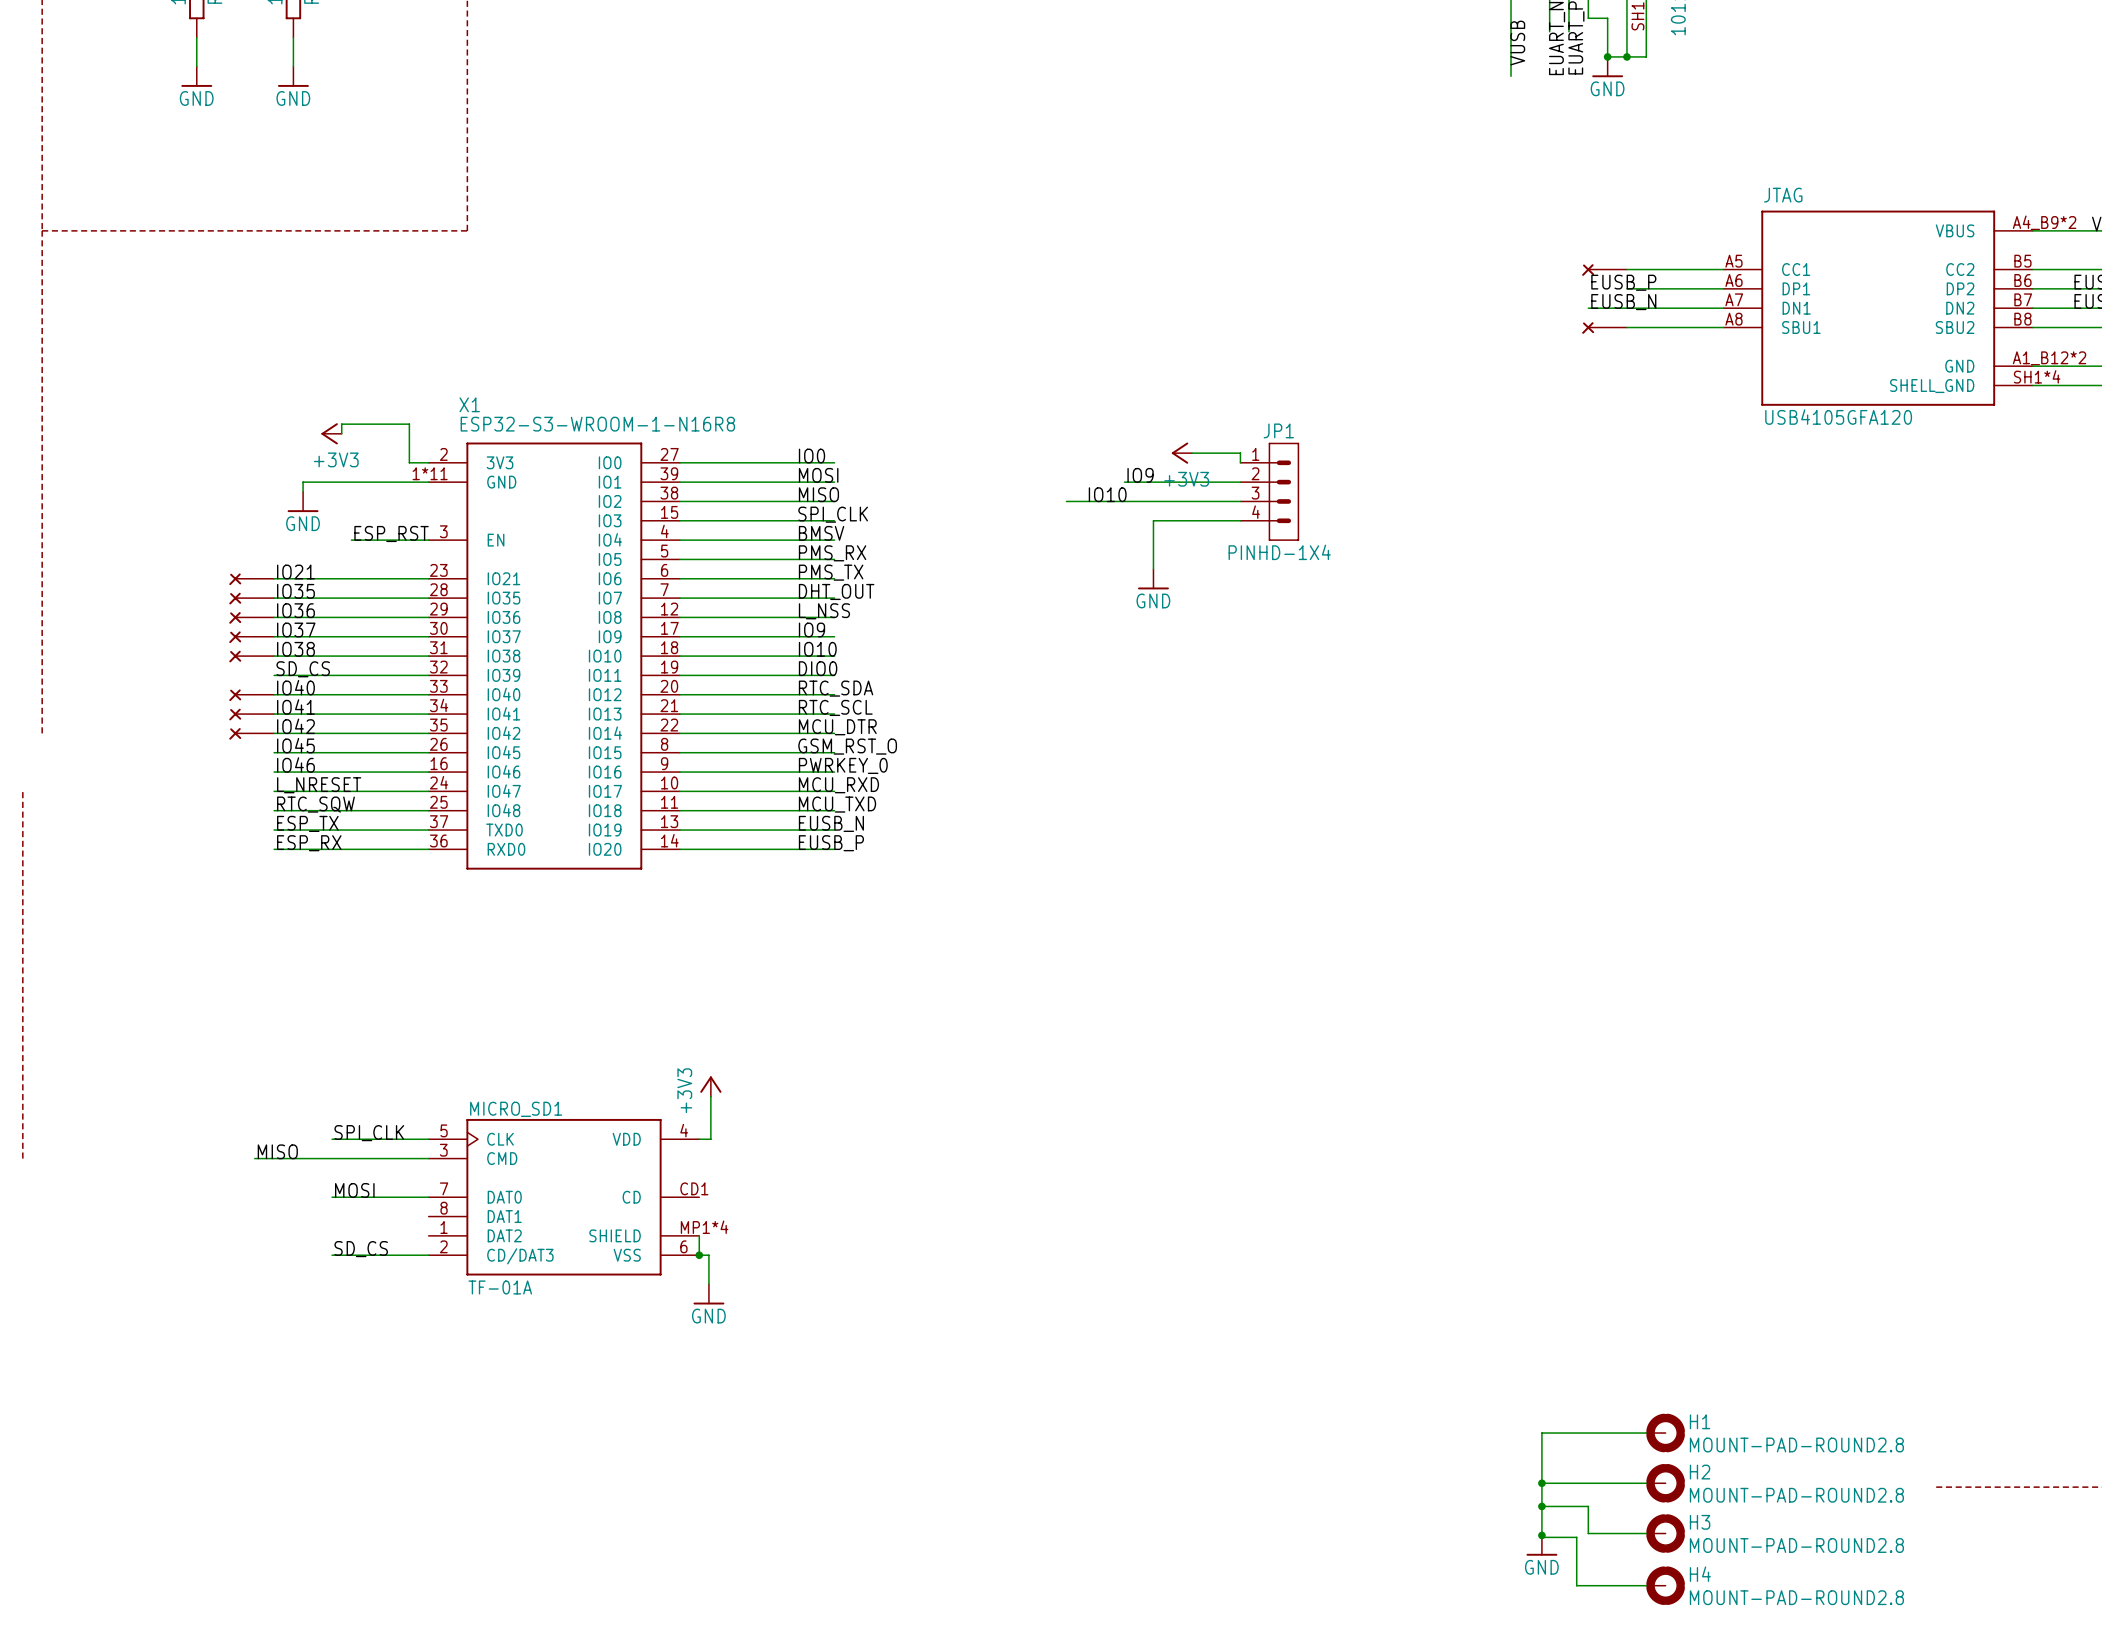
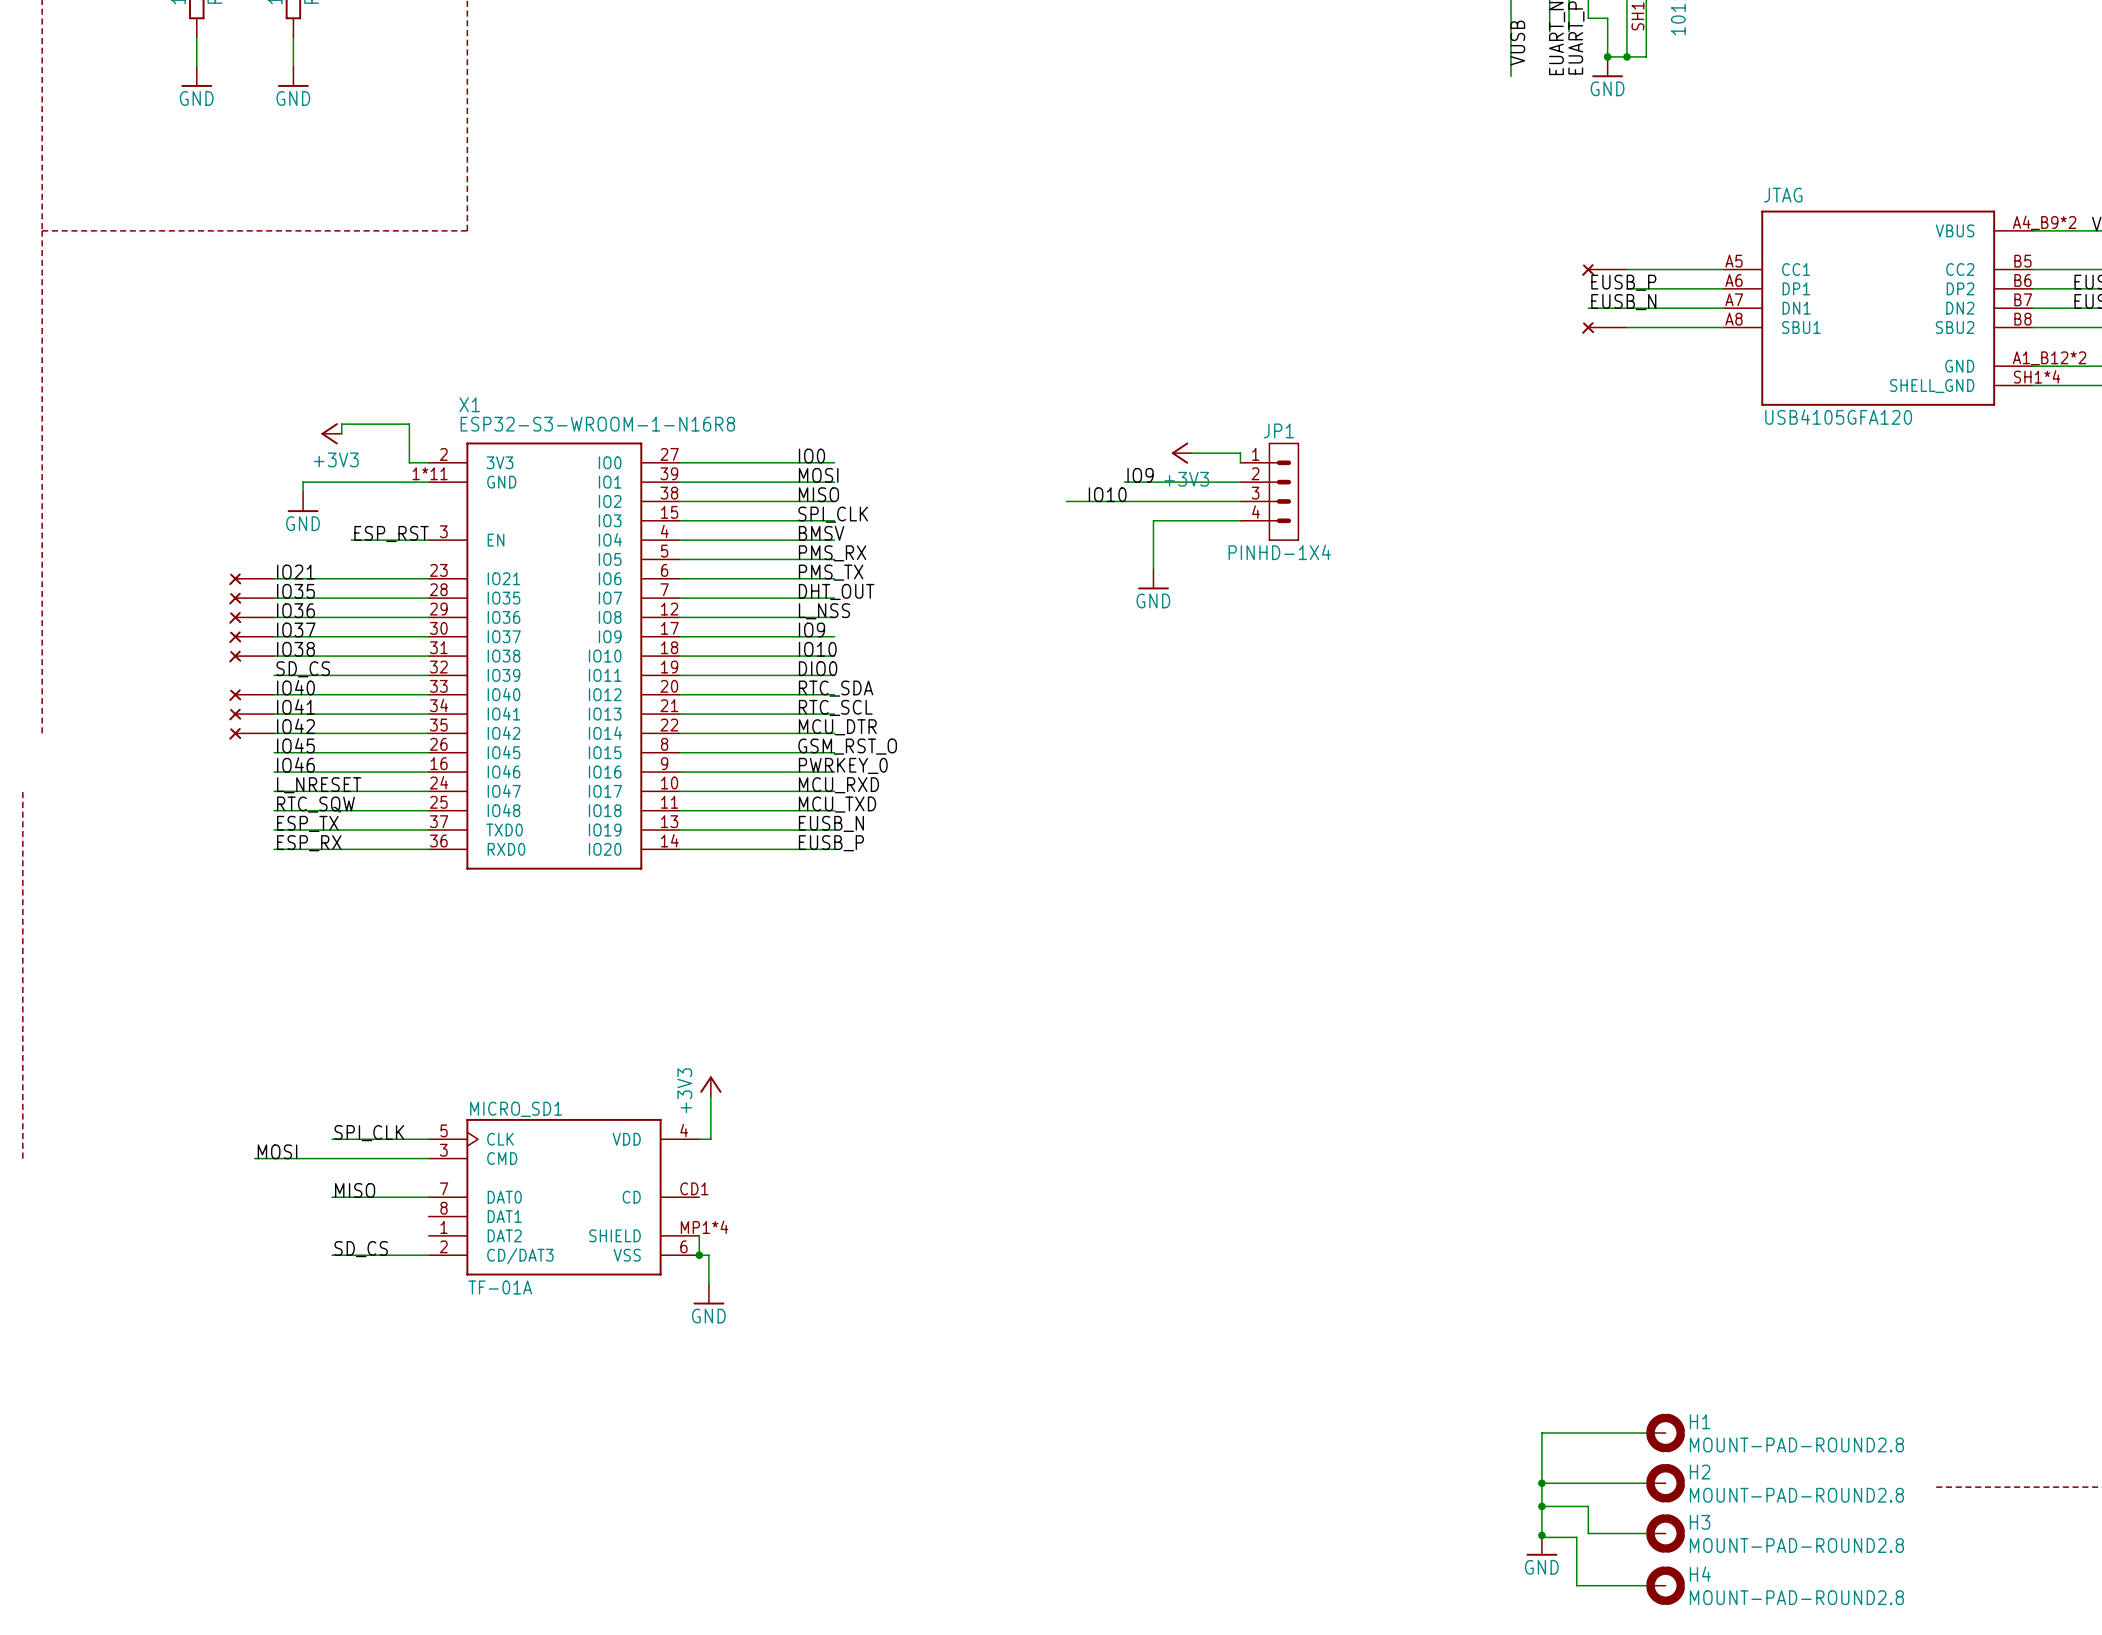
label: MISO (277, 1151) -> MOSI (277, 1151)
label: MOSI (354, 1190) -> MISO (355, 1190)

